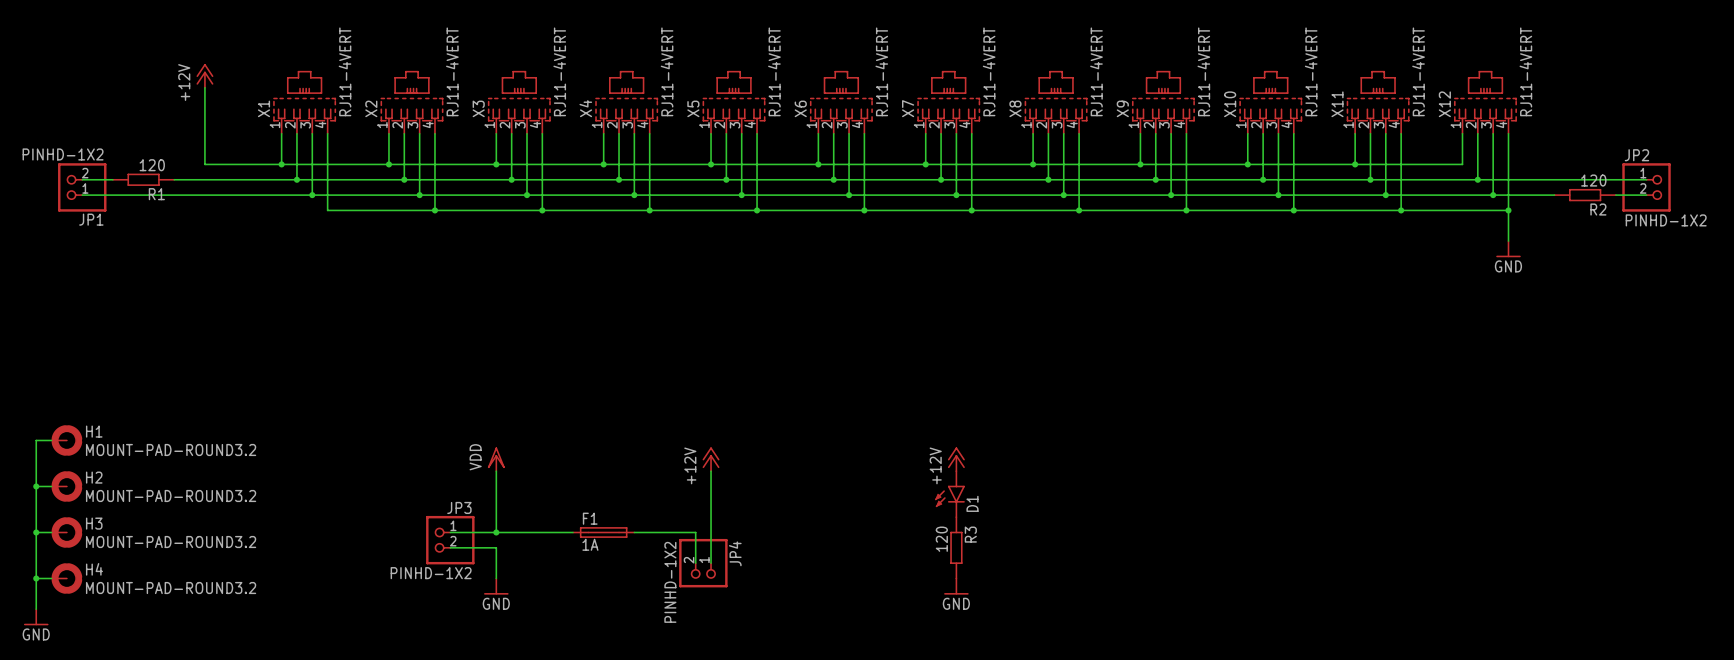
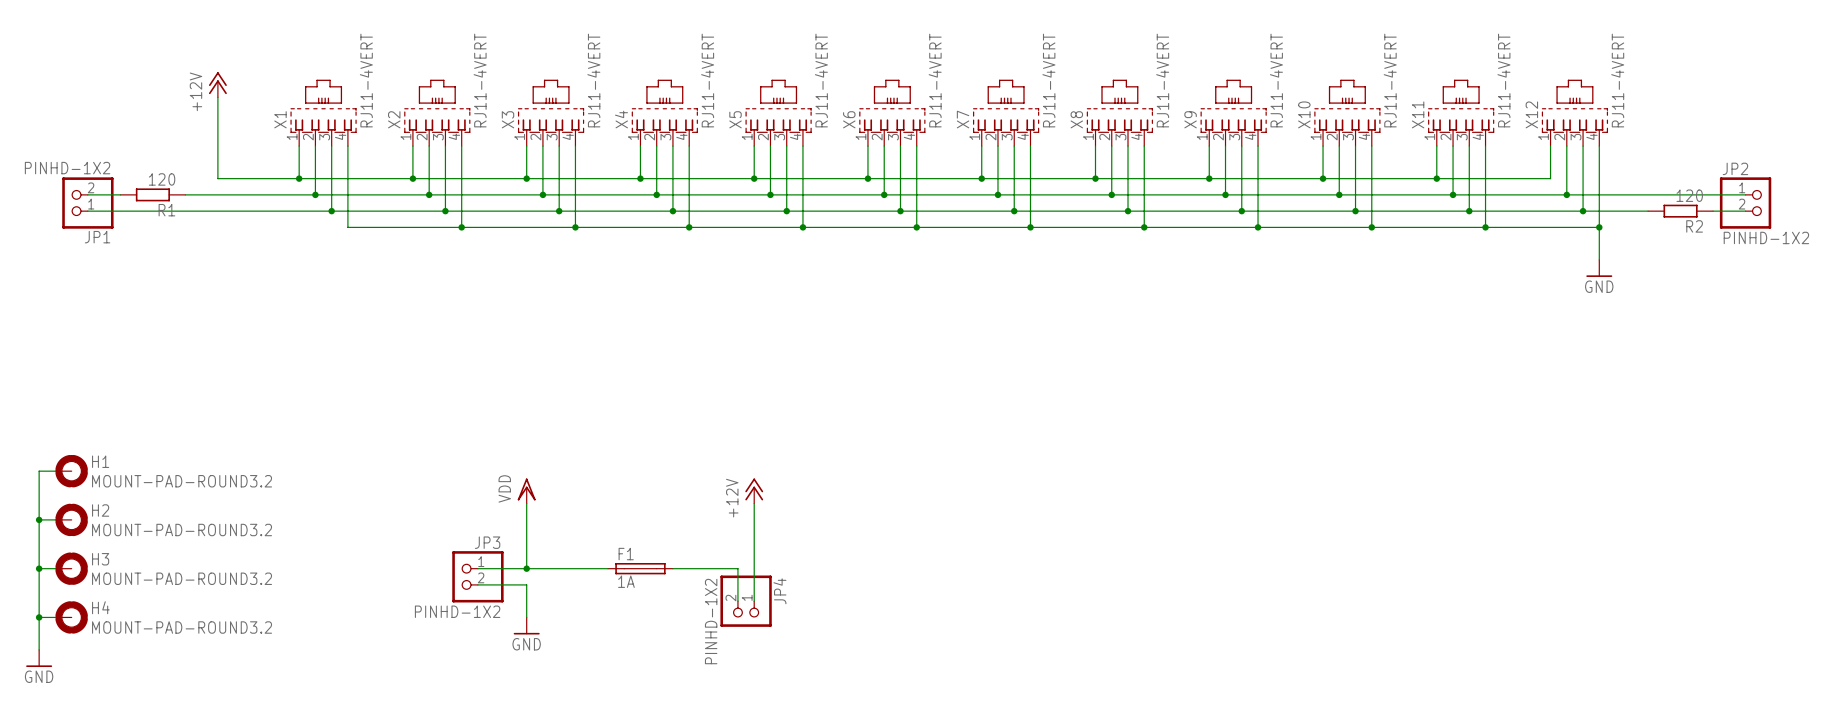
power symbol: +12V (956, 459) -> none
D1: (950, 494) -> none
R3: 120 (956, 547) -> none
power symbol: GND (956, 586) -> none

